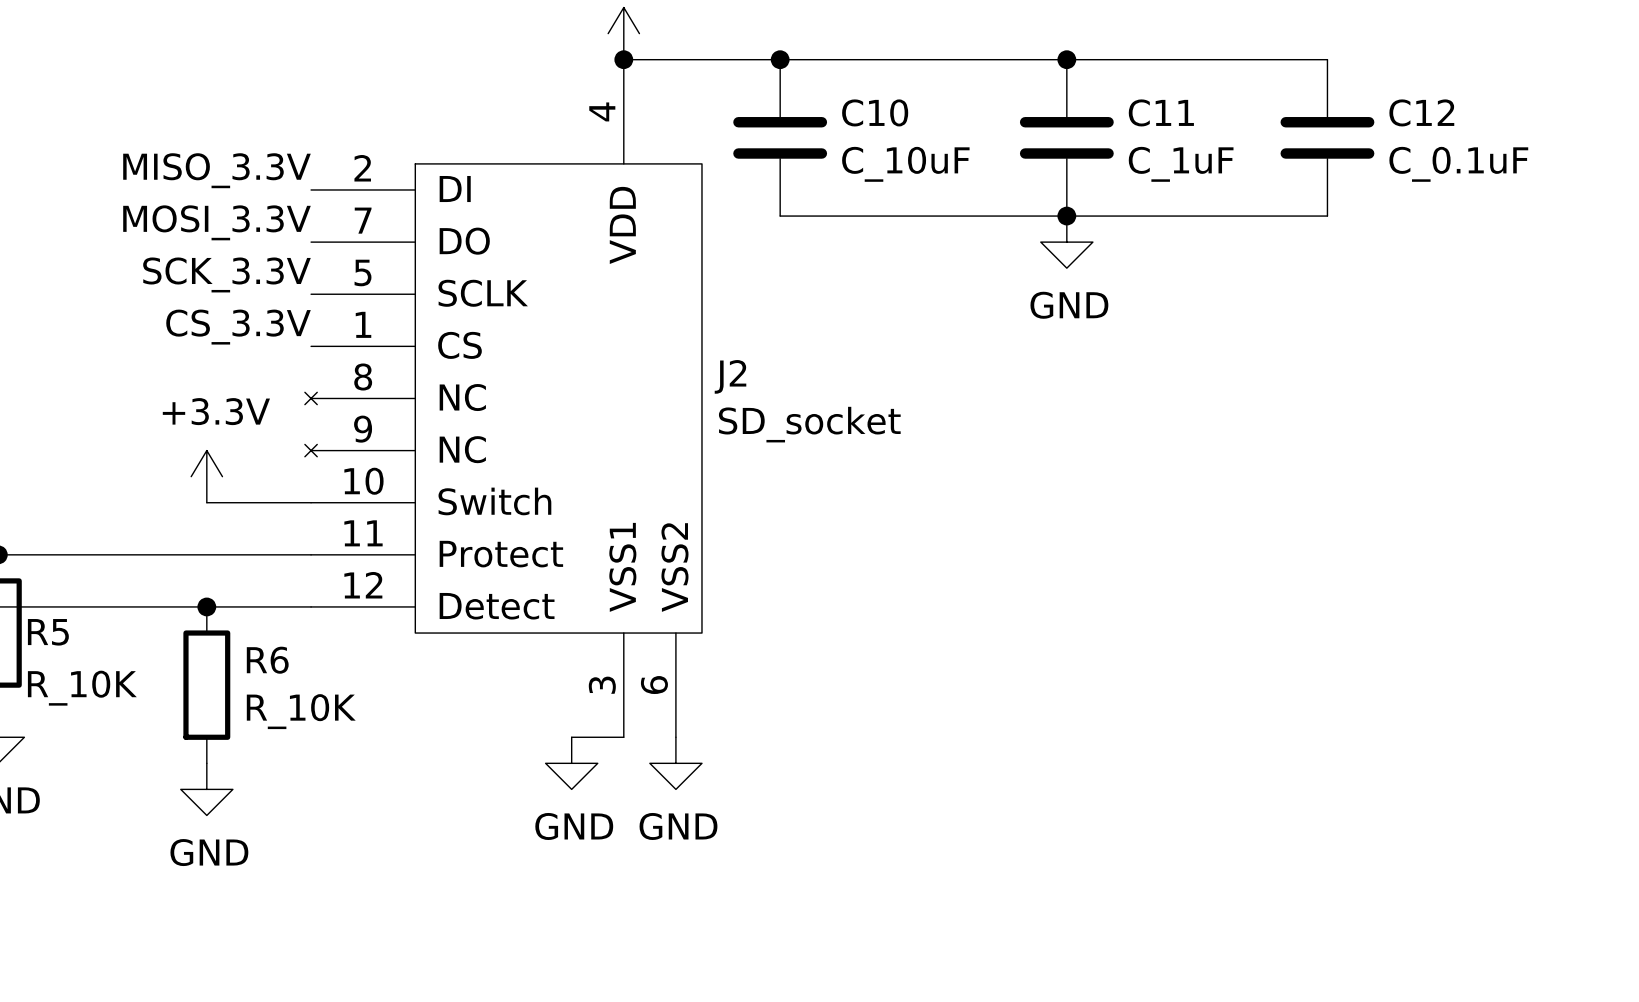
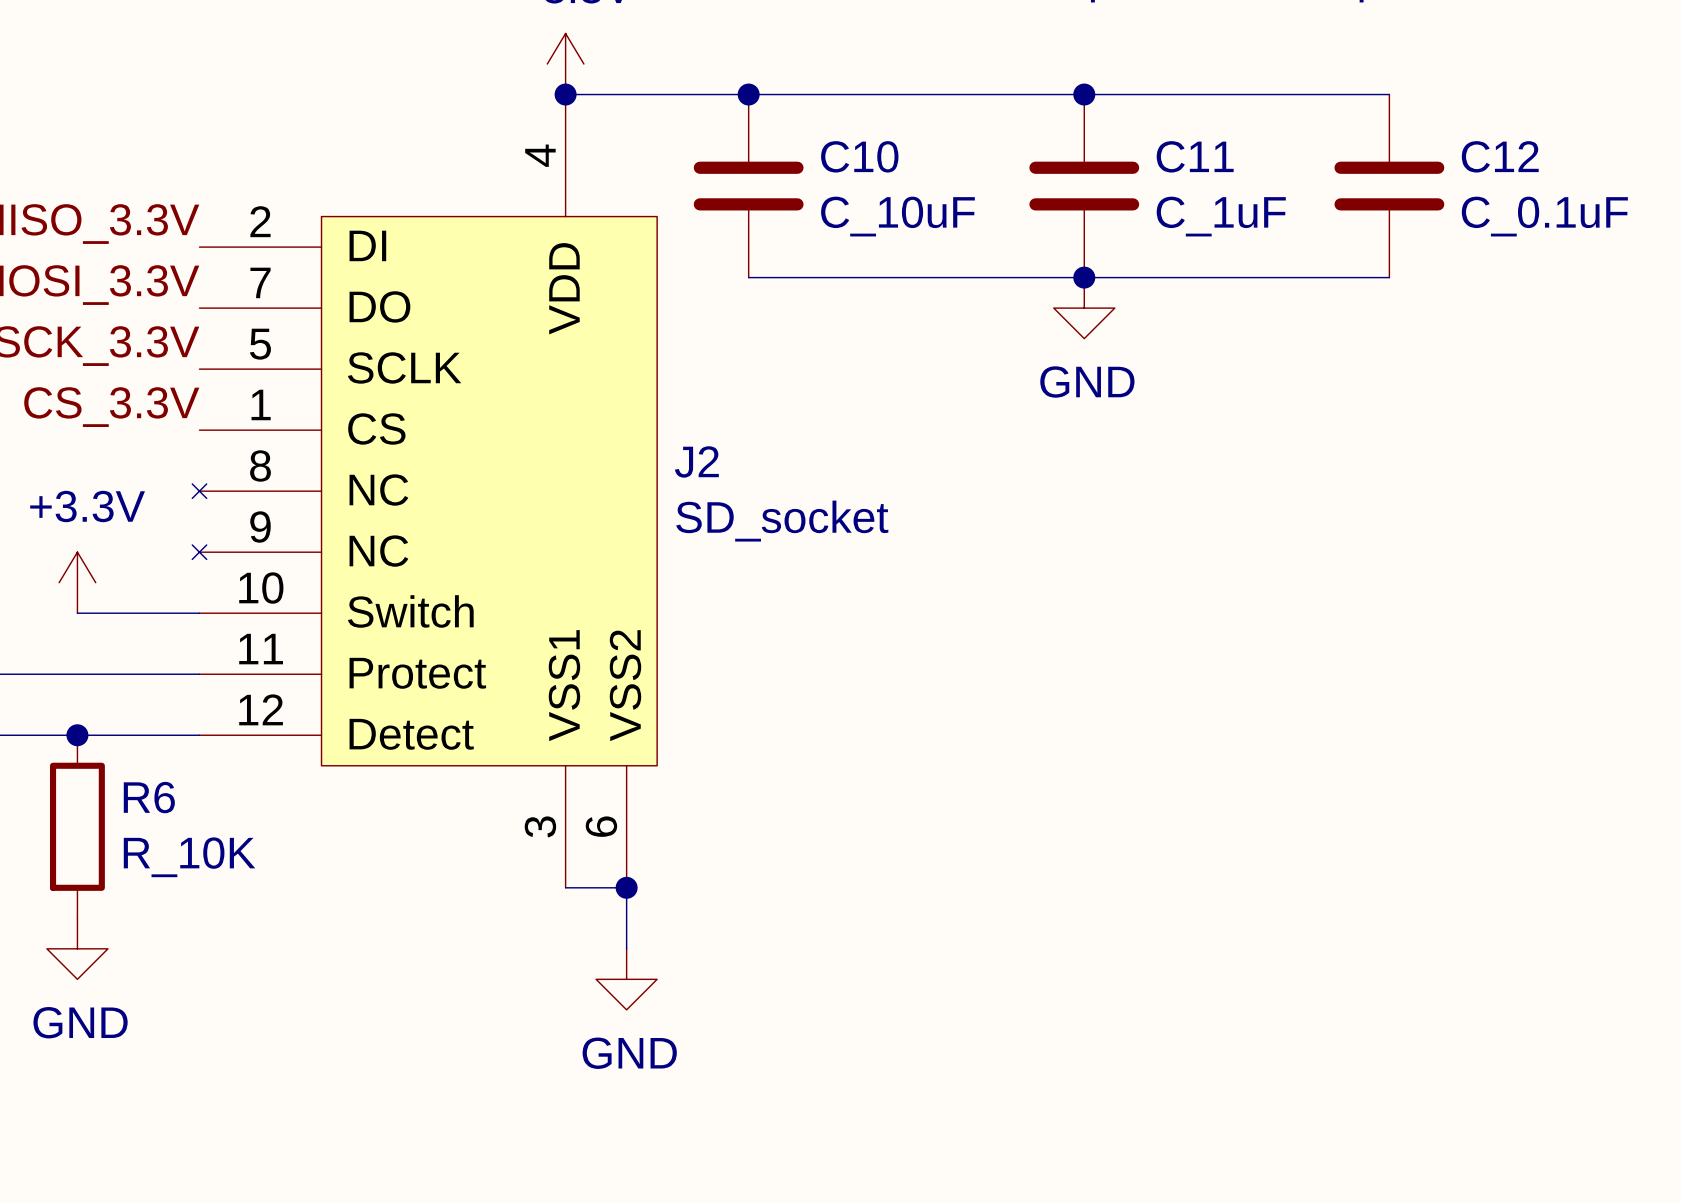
wire: (571, 737) (623, 737) -> (626, 948) (626, 887) (565, 887)
junction: none -> (626, 887)
power symbol: GND (571, 763) -> none
power symbol position: GND (675, 763) -> GND (626, 979)

